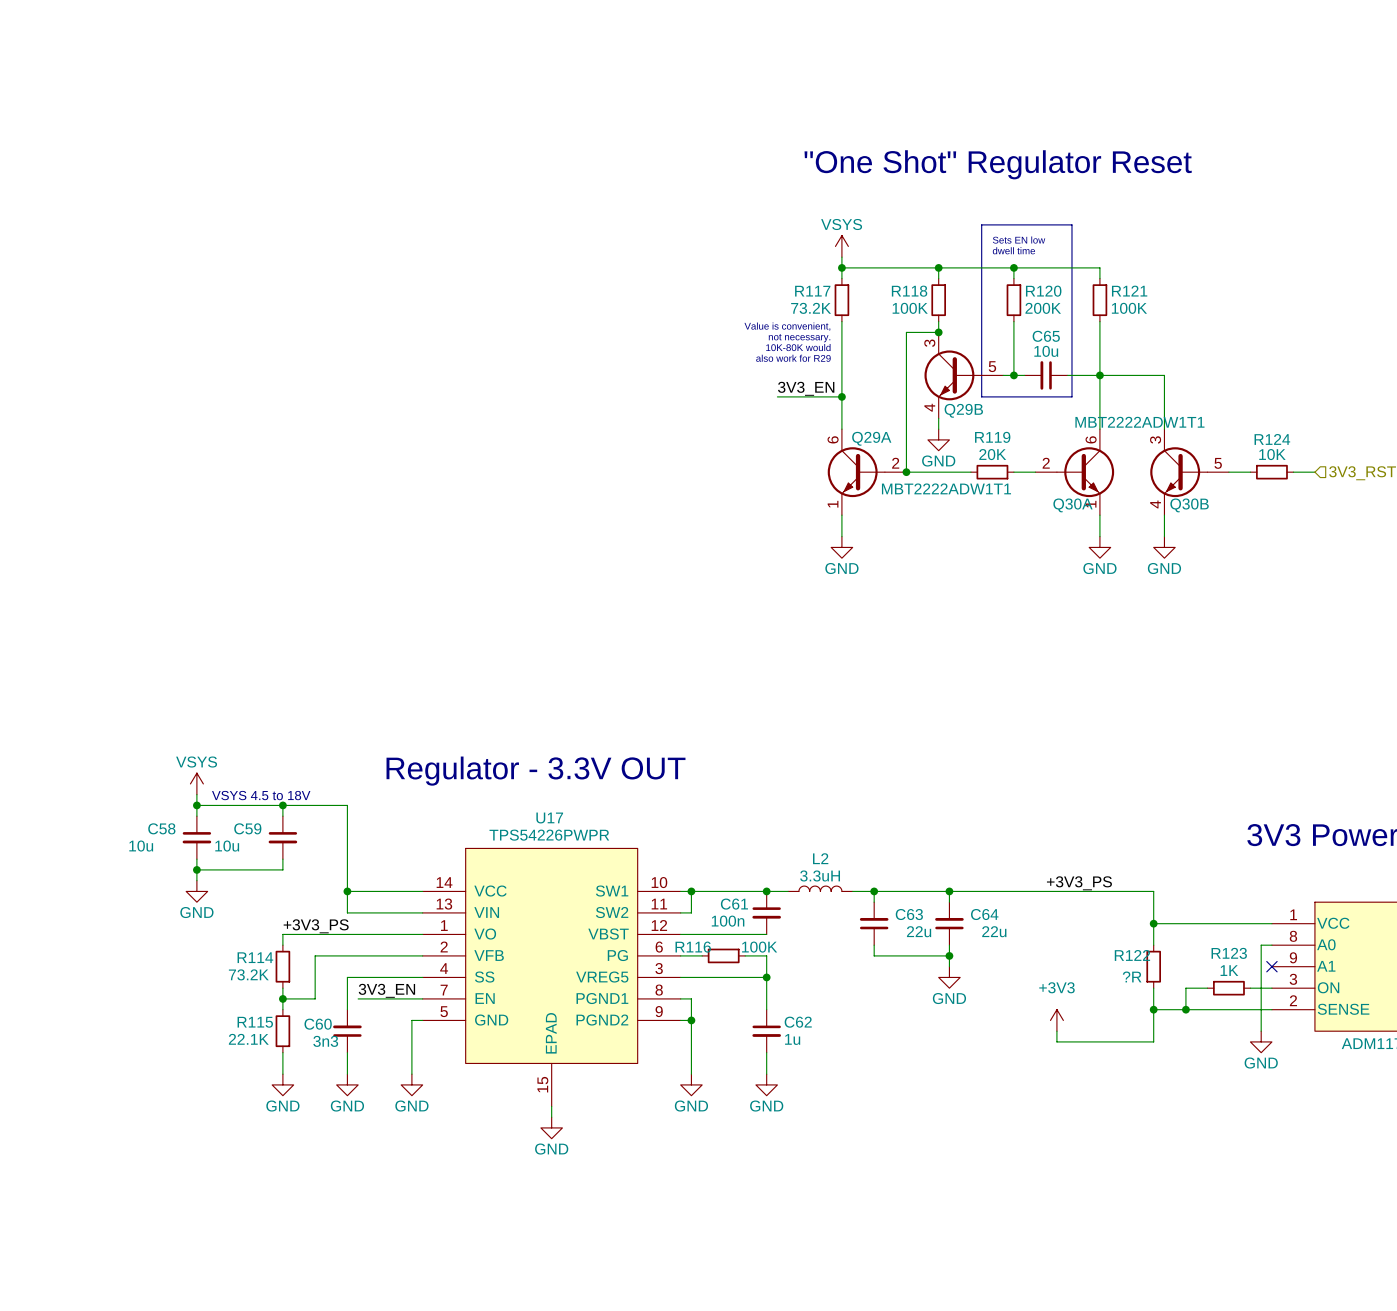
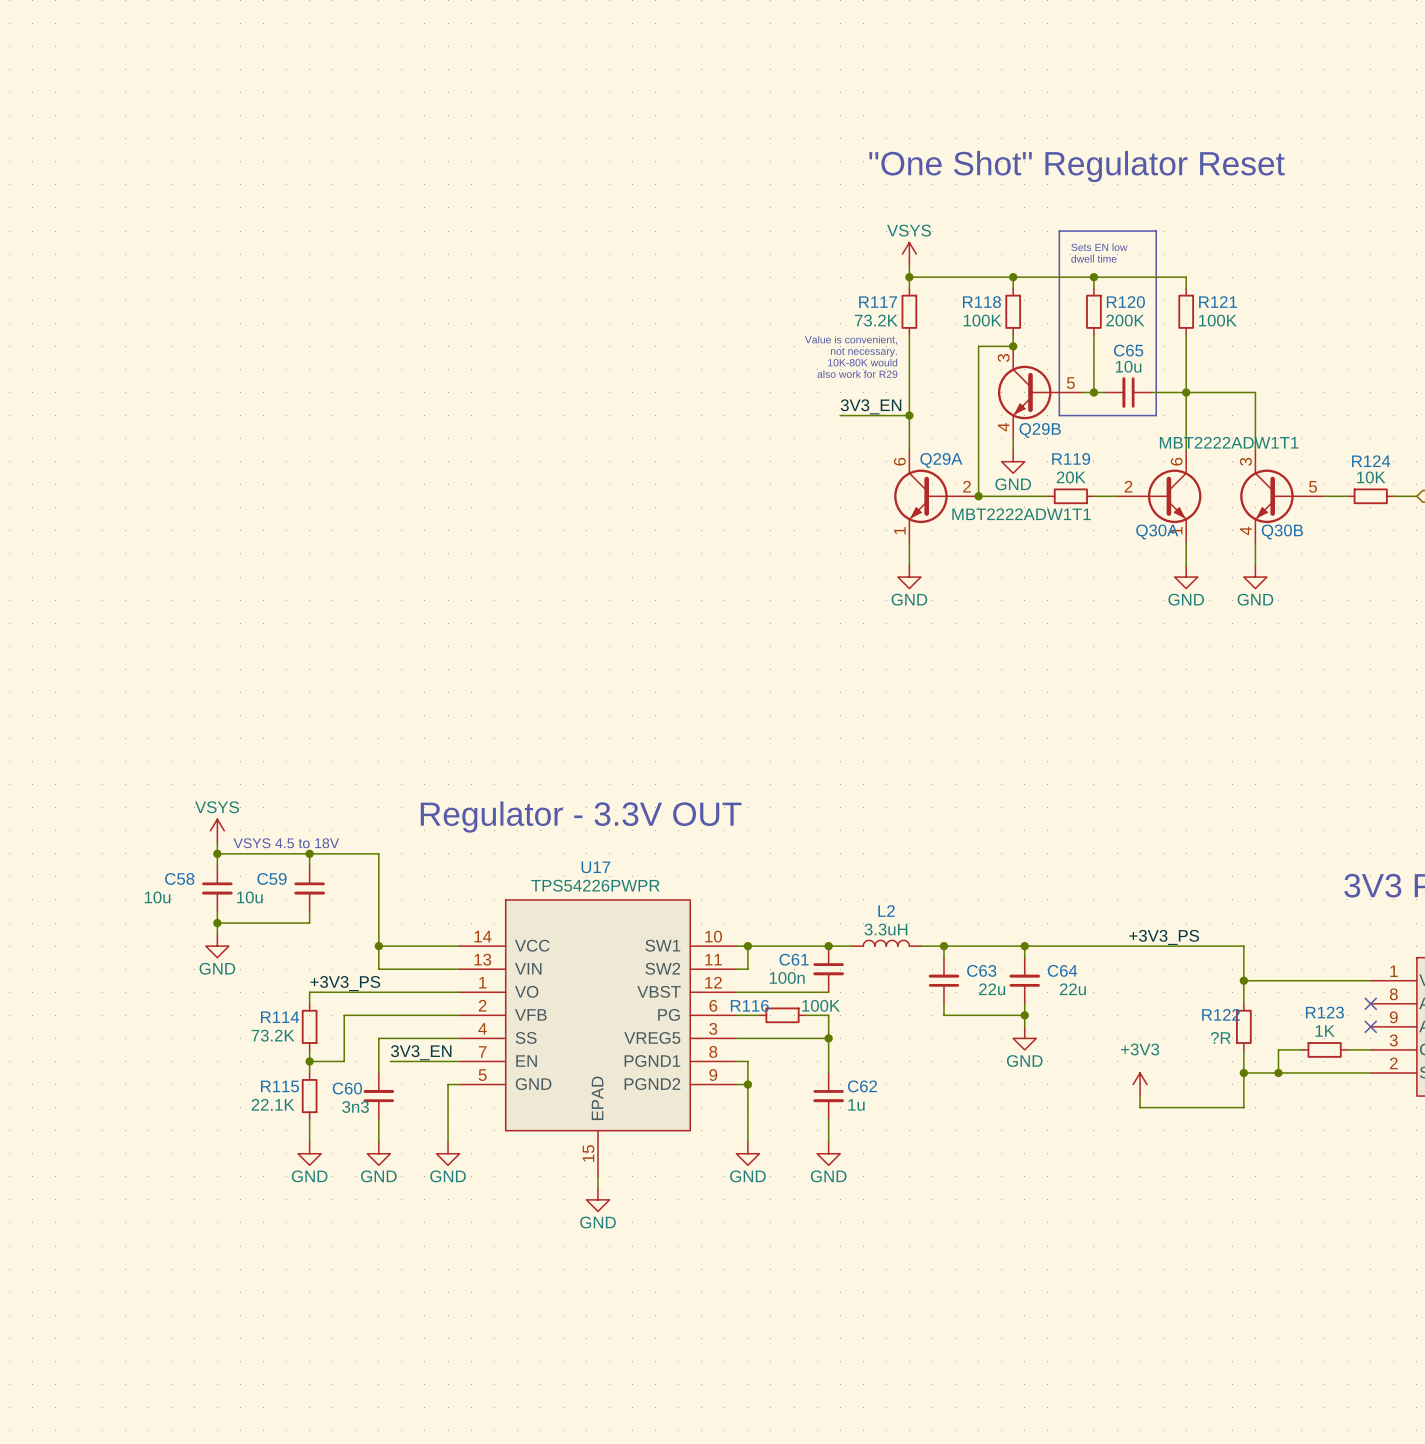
wire: (1271, 945) (1261, 945) (1261, 1031) -> none
no-connect mark: none -> (1370, 1003)
power symbol: GND (1261, 1041) -> none

